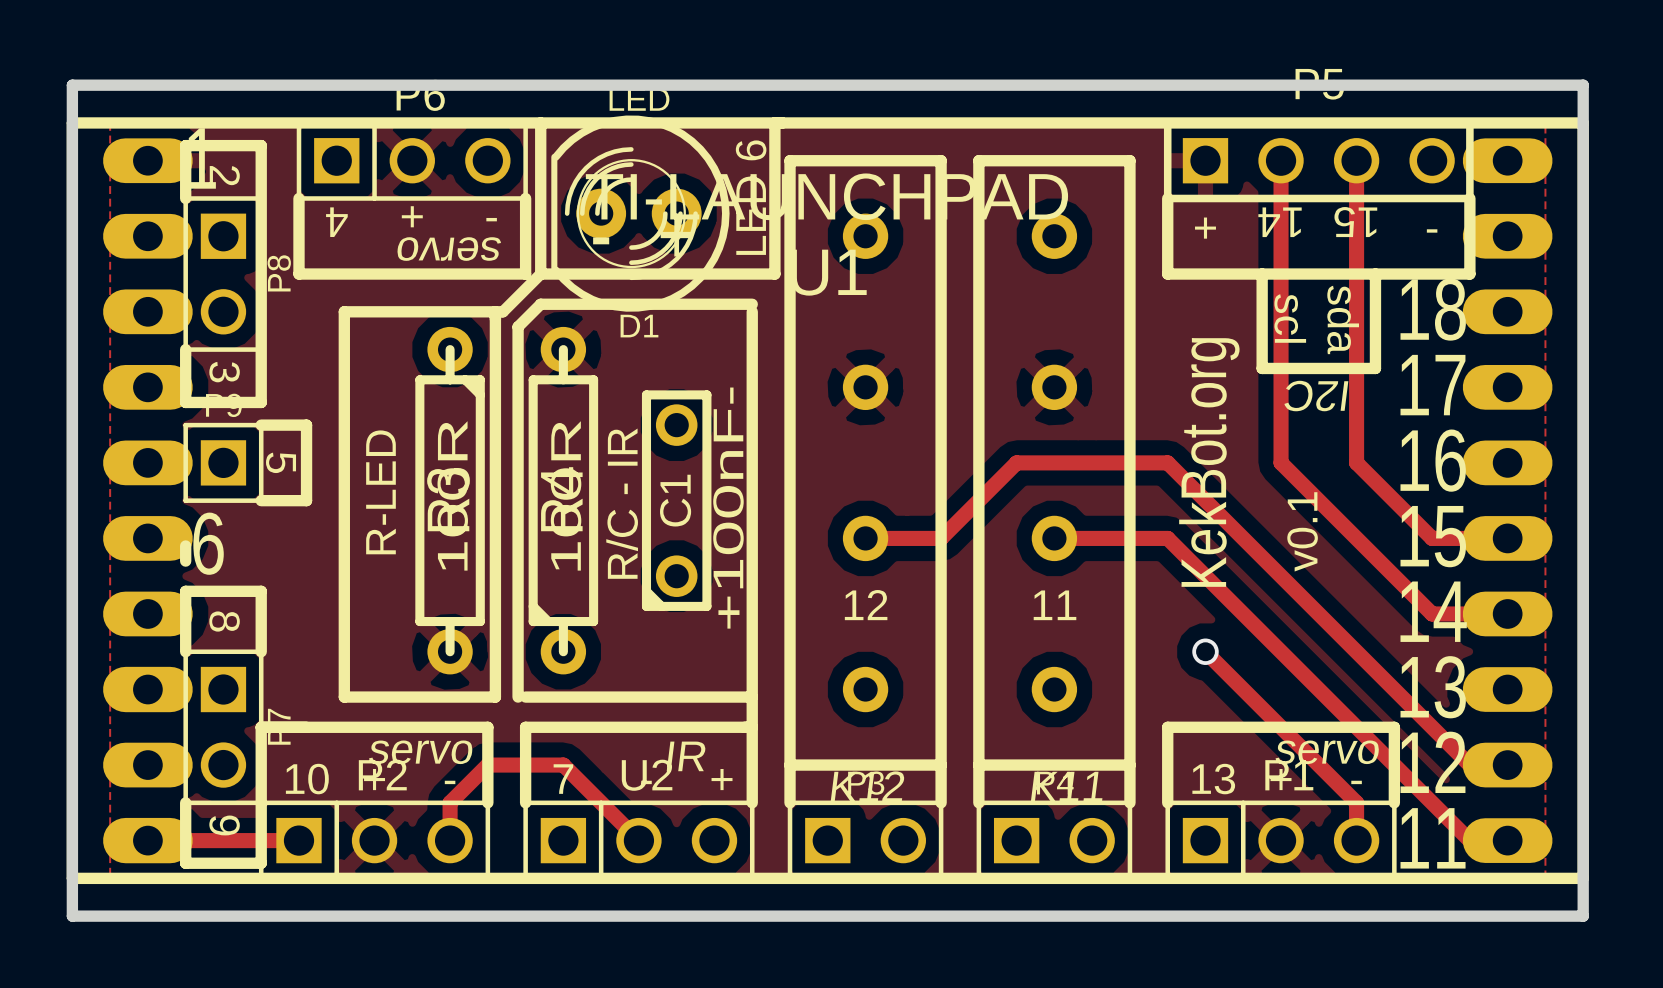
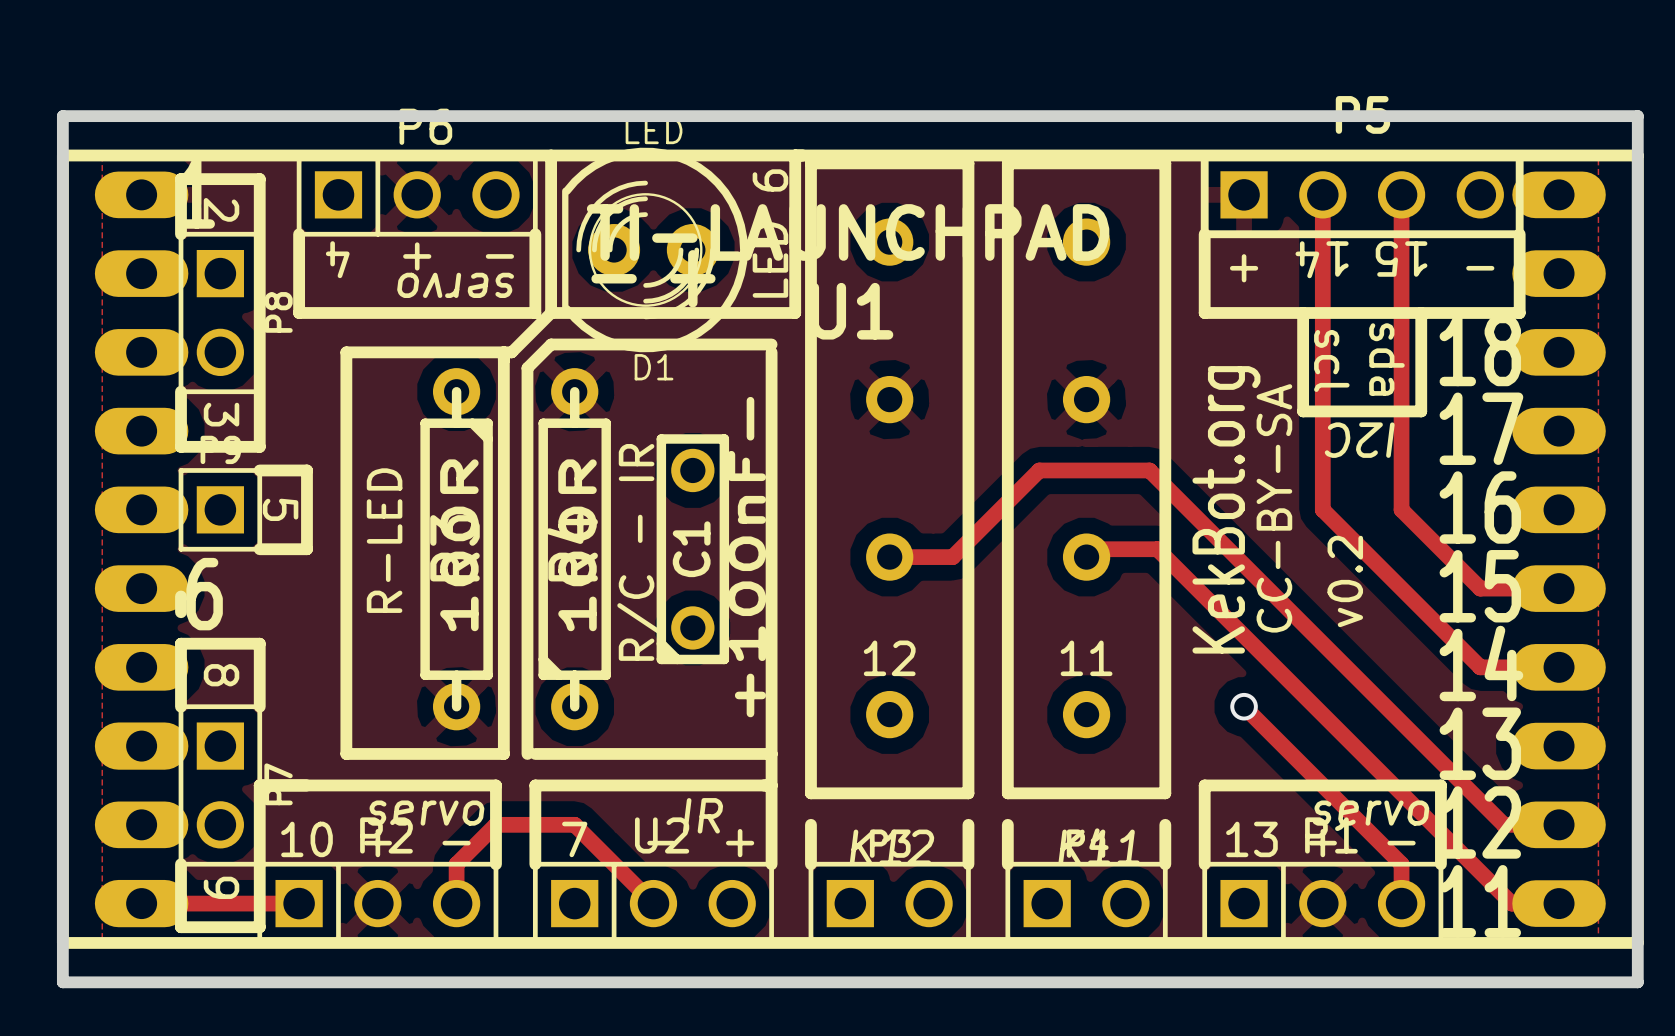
text: none -> CC-BY-SA (1274, 508)
part position: (865, 462) -> (889, 478)
part position: (1054, 462) -> (1086, 478)
text position: KekBot.org (1209, 462) -> KekBot.org (1226, 509)
text: v0.1 (1302, 531) -> v0.2 (1345, 581)
track: (865, 538) (941, 538) (1016, 462) (1167, 462) (1469, 765) -> (889, 557) (952, 557) (1039, 470) (1149, 470) (1503, 824) (1519, 824)
track: (1054, 538) (1167, 538) (1469, 840) -> (1086, 549) (1157, 549) (1511, 903) (1519, 903)

